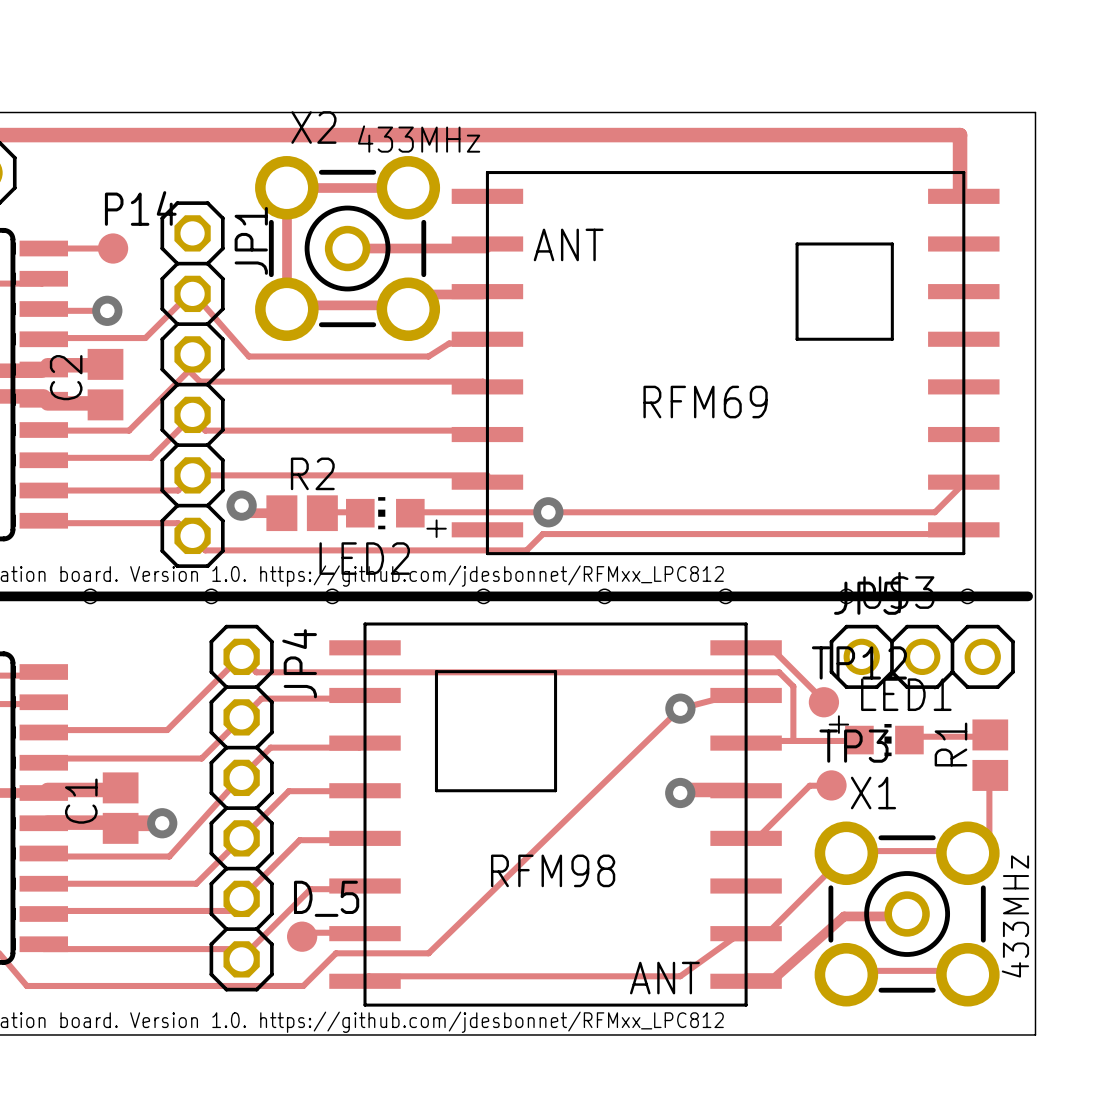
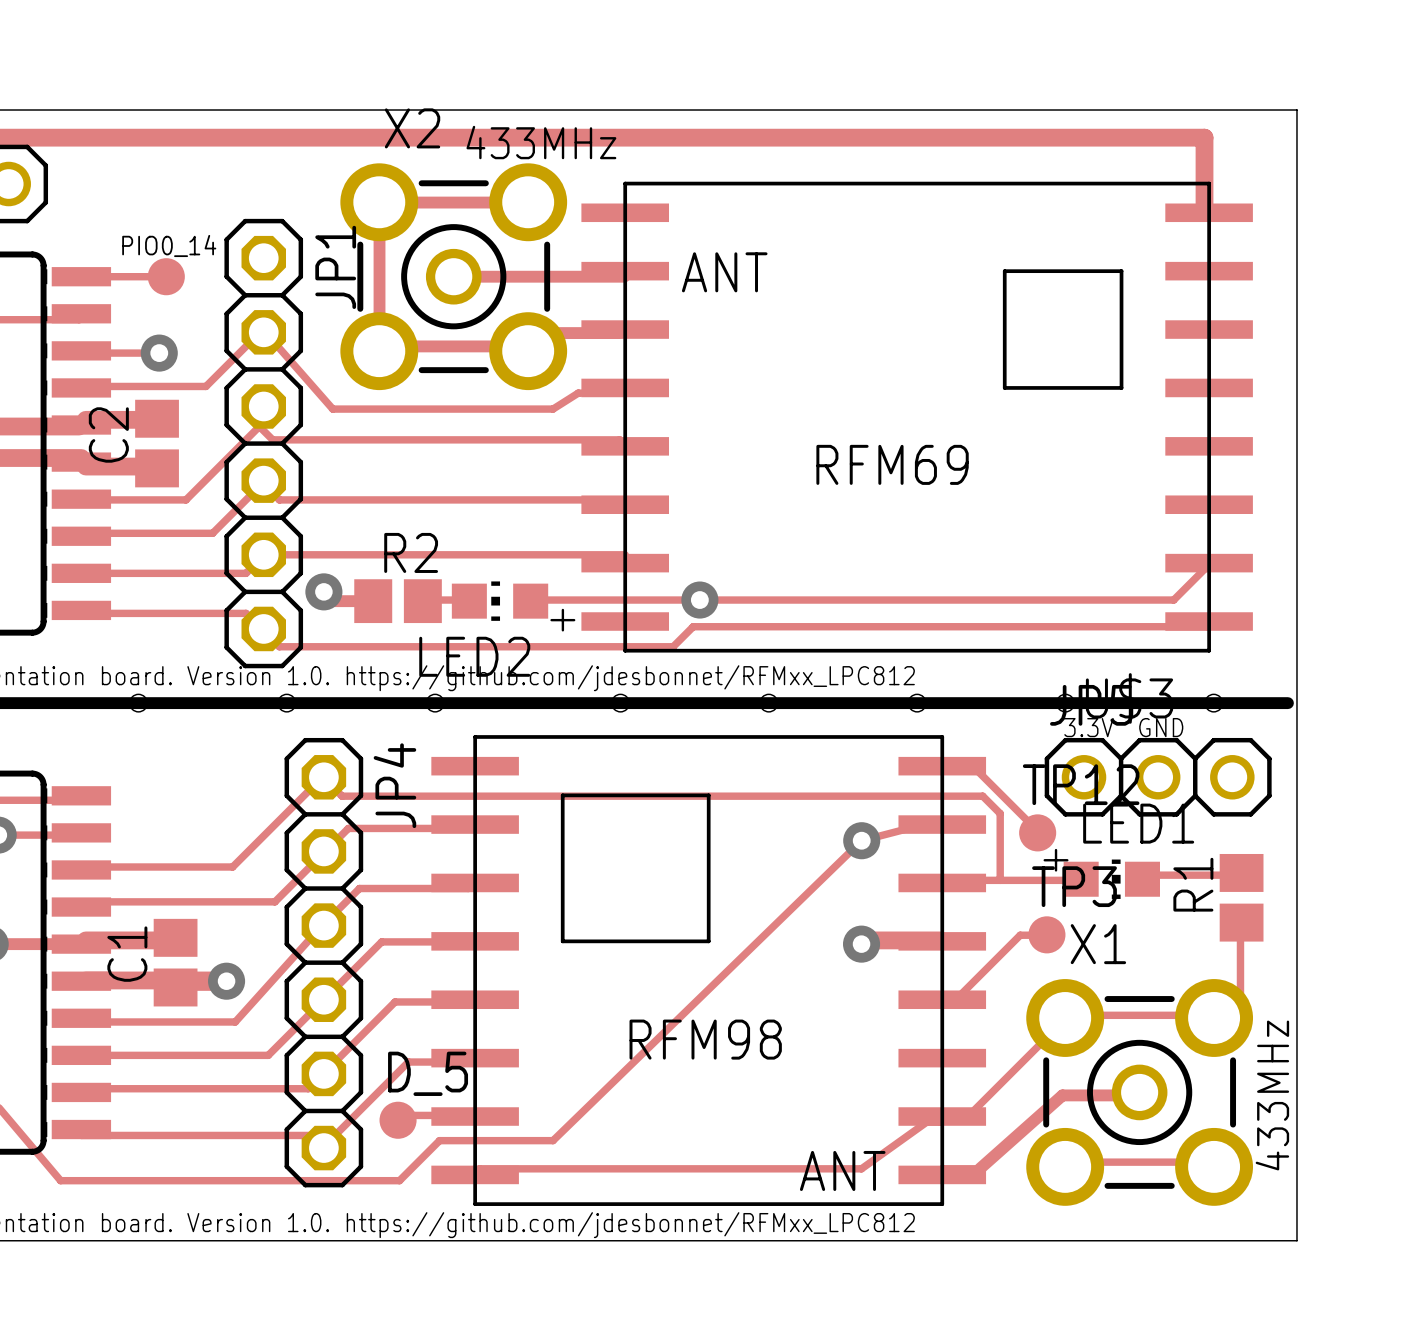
P14 name: P14 (140, 208) -> PIO0_14 (169, 245)
text: none -> 3.3V (1089, 727)
text: none -> GND (1161, 727)

